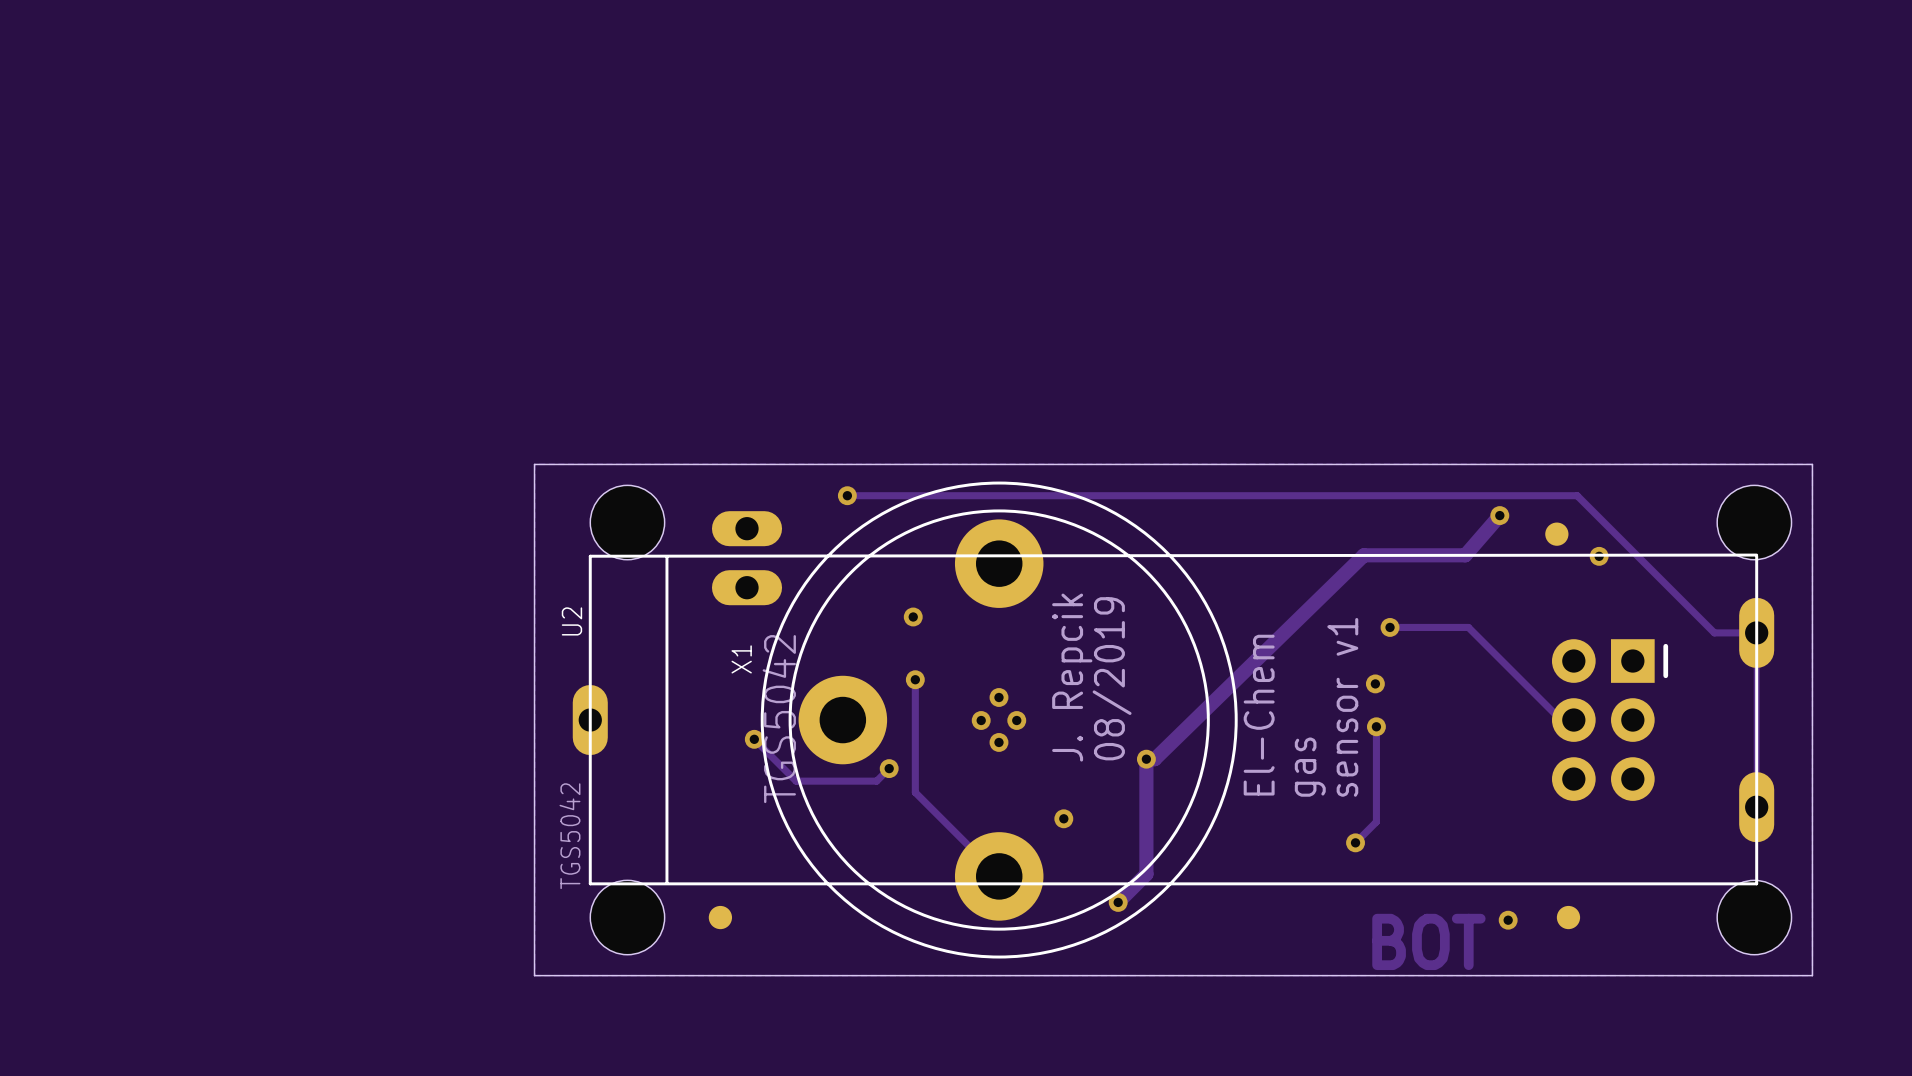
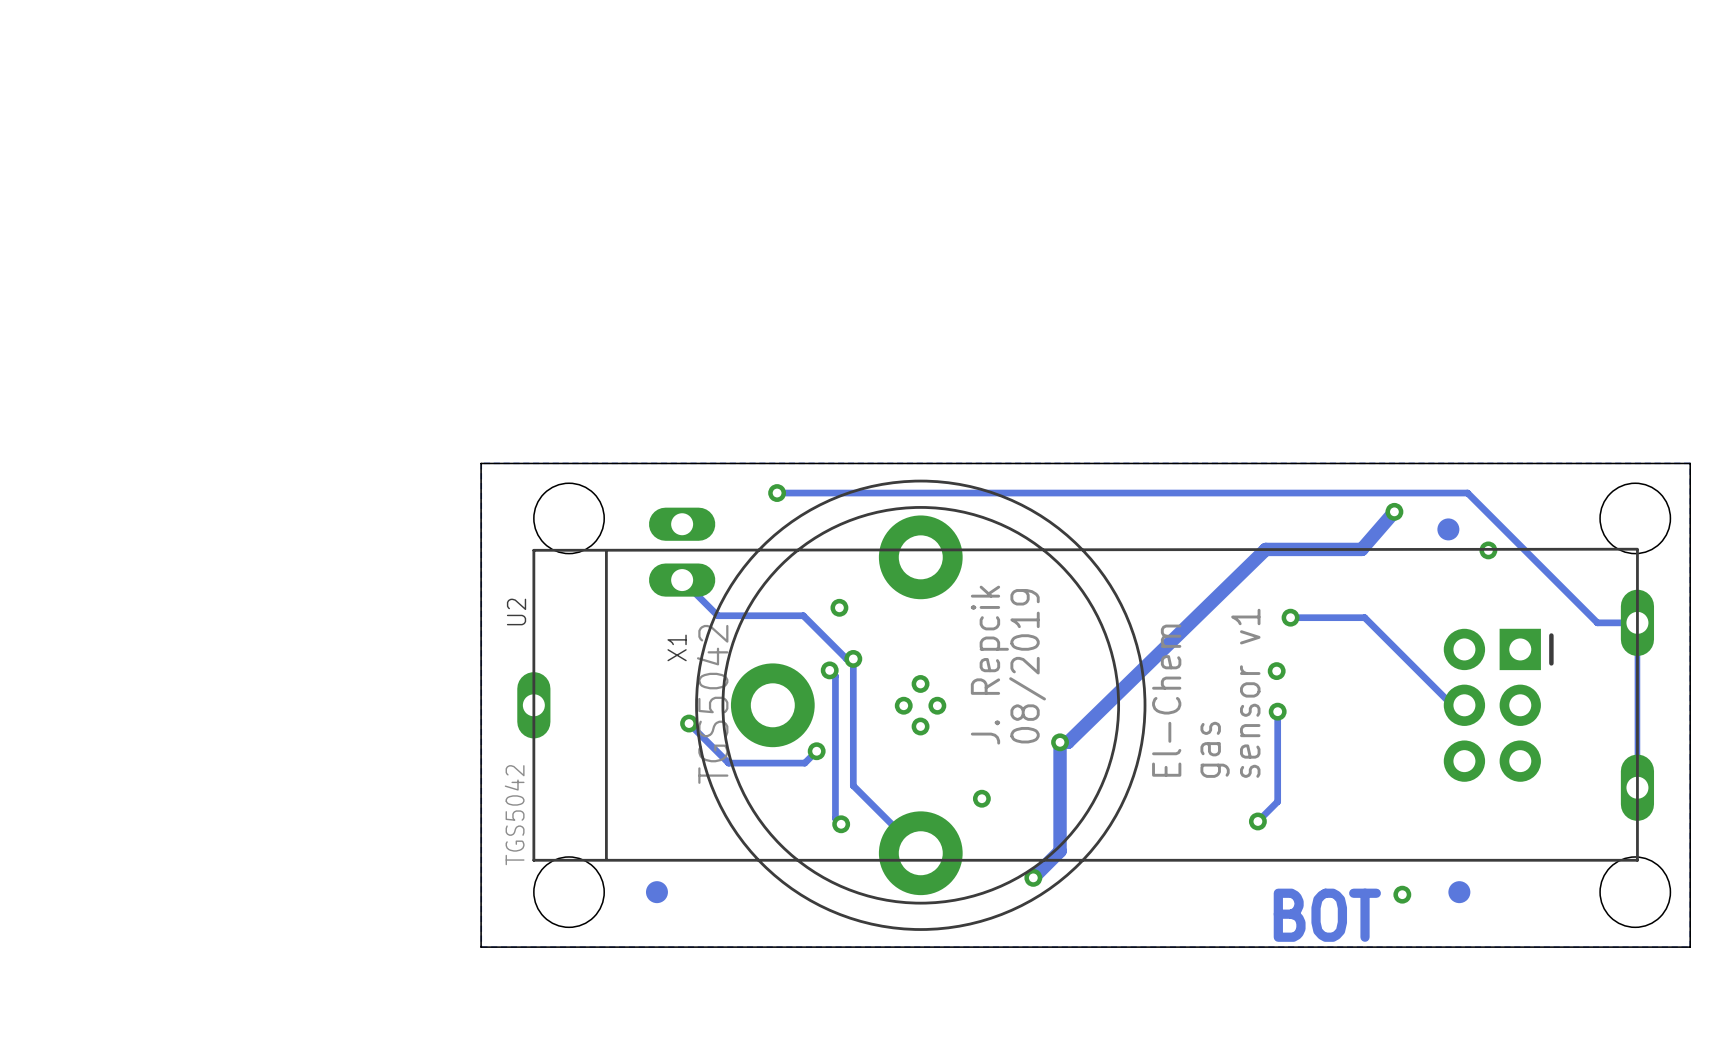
via: none -> (853, 658)
track: (915, 679) (915, 792) (927, 805) -> (682, 580) (717, 615) (803, 615) (846, 658) (853, 658) (853, 785)
via: (915, 679) -> none
track: none -> (829, 670) (835, 676) (835, 818) (841, 824)
via: none -> (829, 670)
via: none -> (841, 824)

